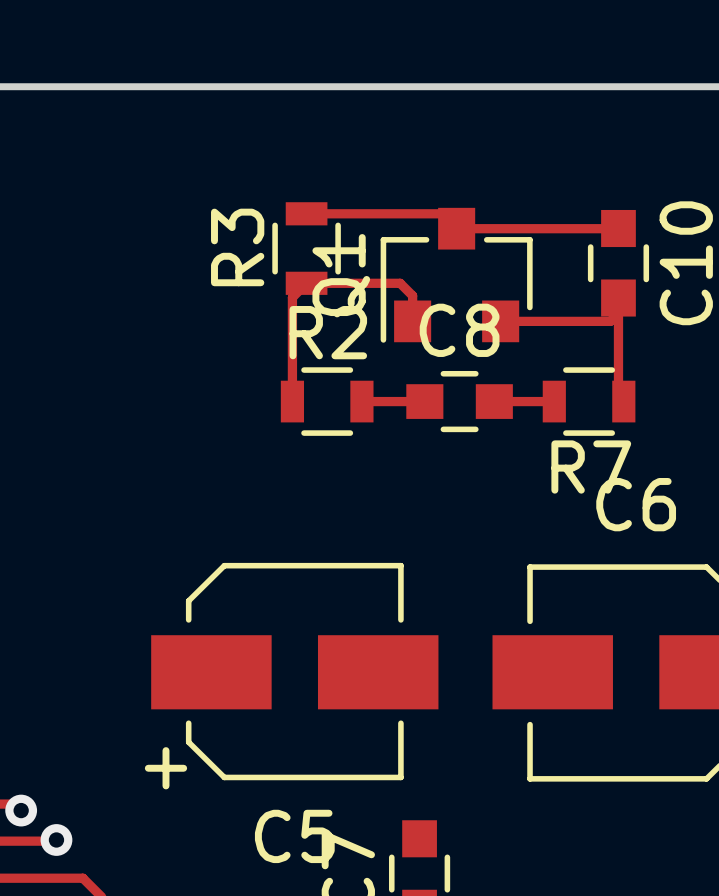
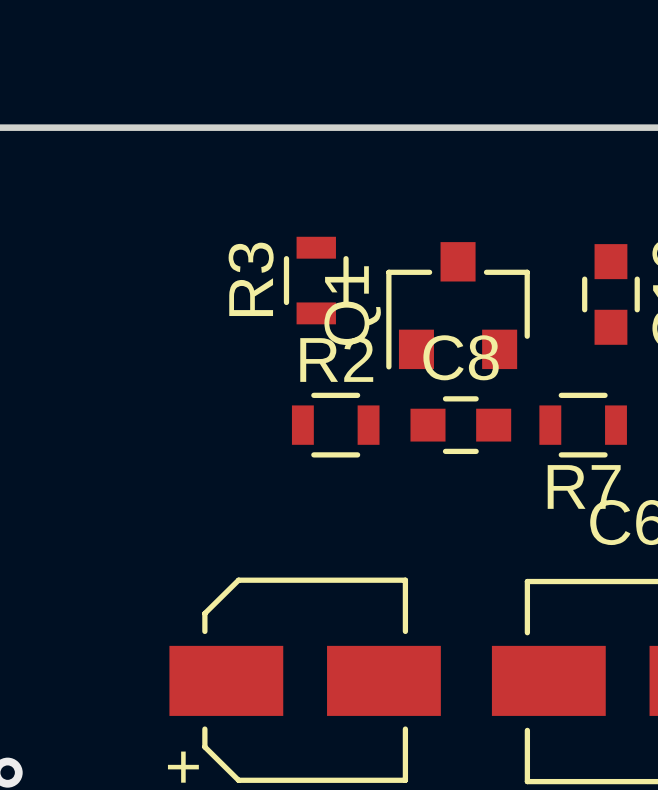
track: (306, 213) (441, 213) (456, 228) (618, 228) -> none
track: (618, 298) (618, 396) (623, 401) -> none
track: (618, 313) (610, 321) (500, 321) -> none
track: (412, 321) (412, 295) (400, 283) (306, 283) (292, 297) (292, 401) -> none
track: (361, 401) (424, 401) -> none
track: (494, 401) (554, 401) -> none

